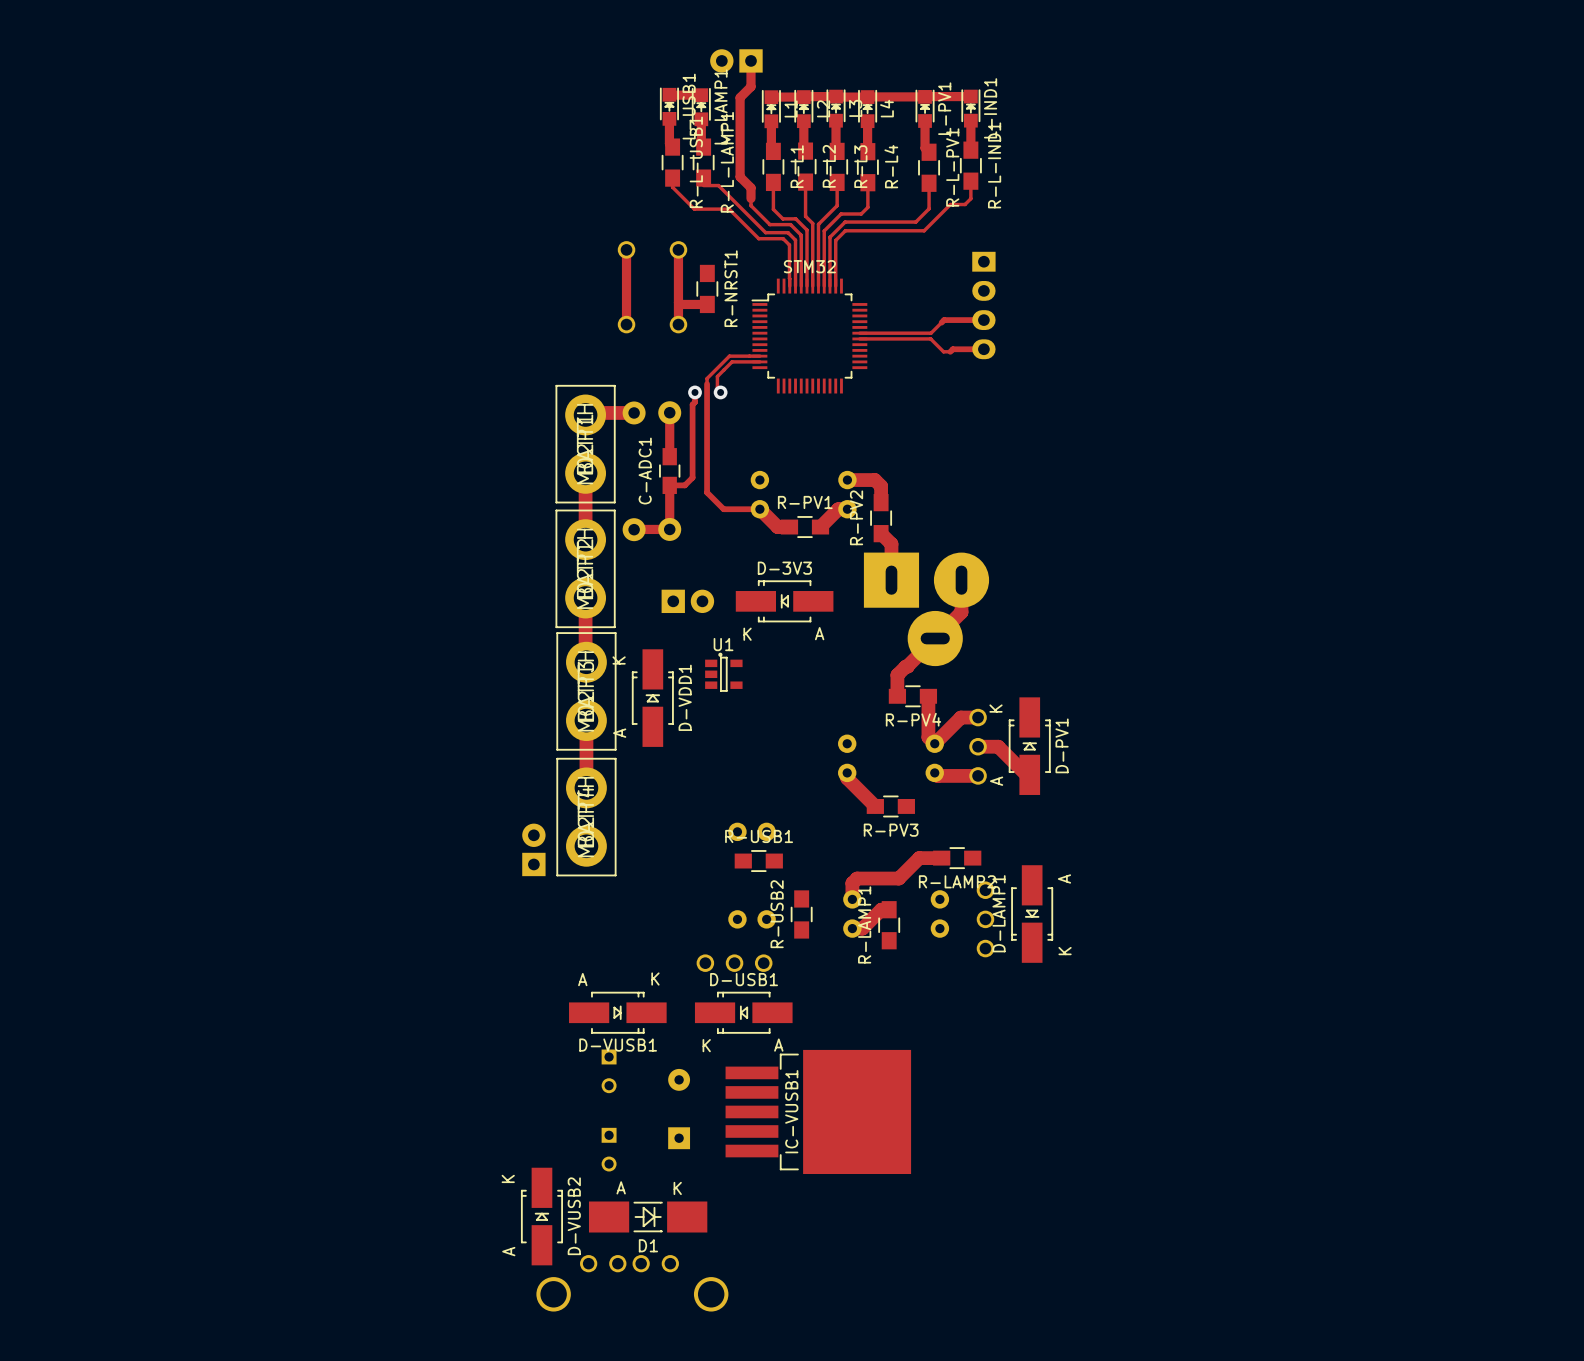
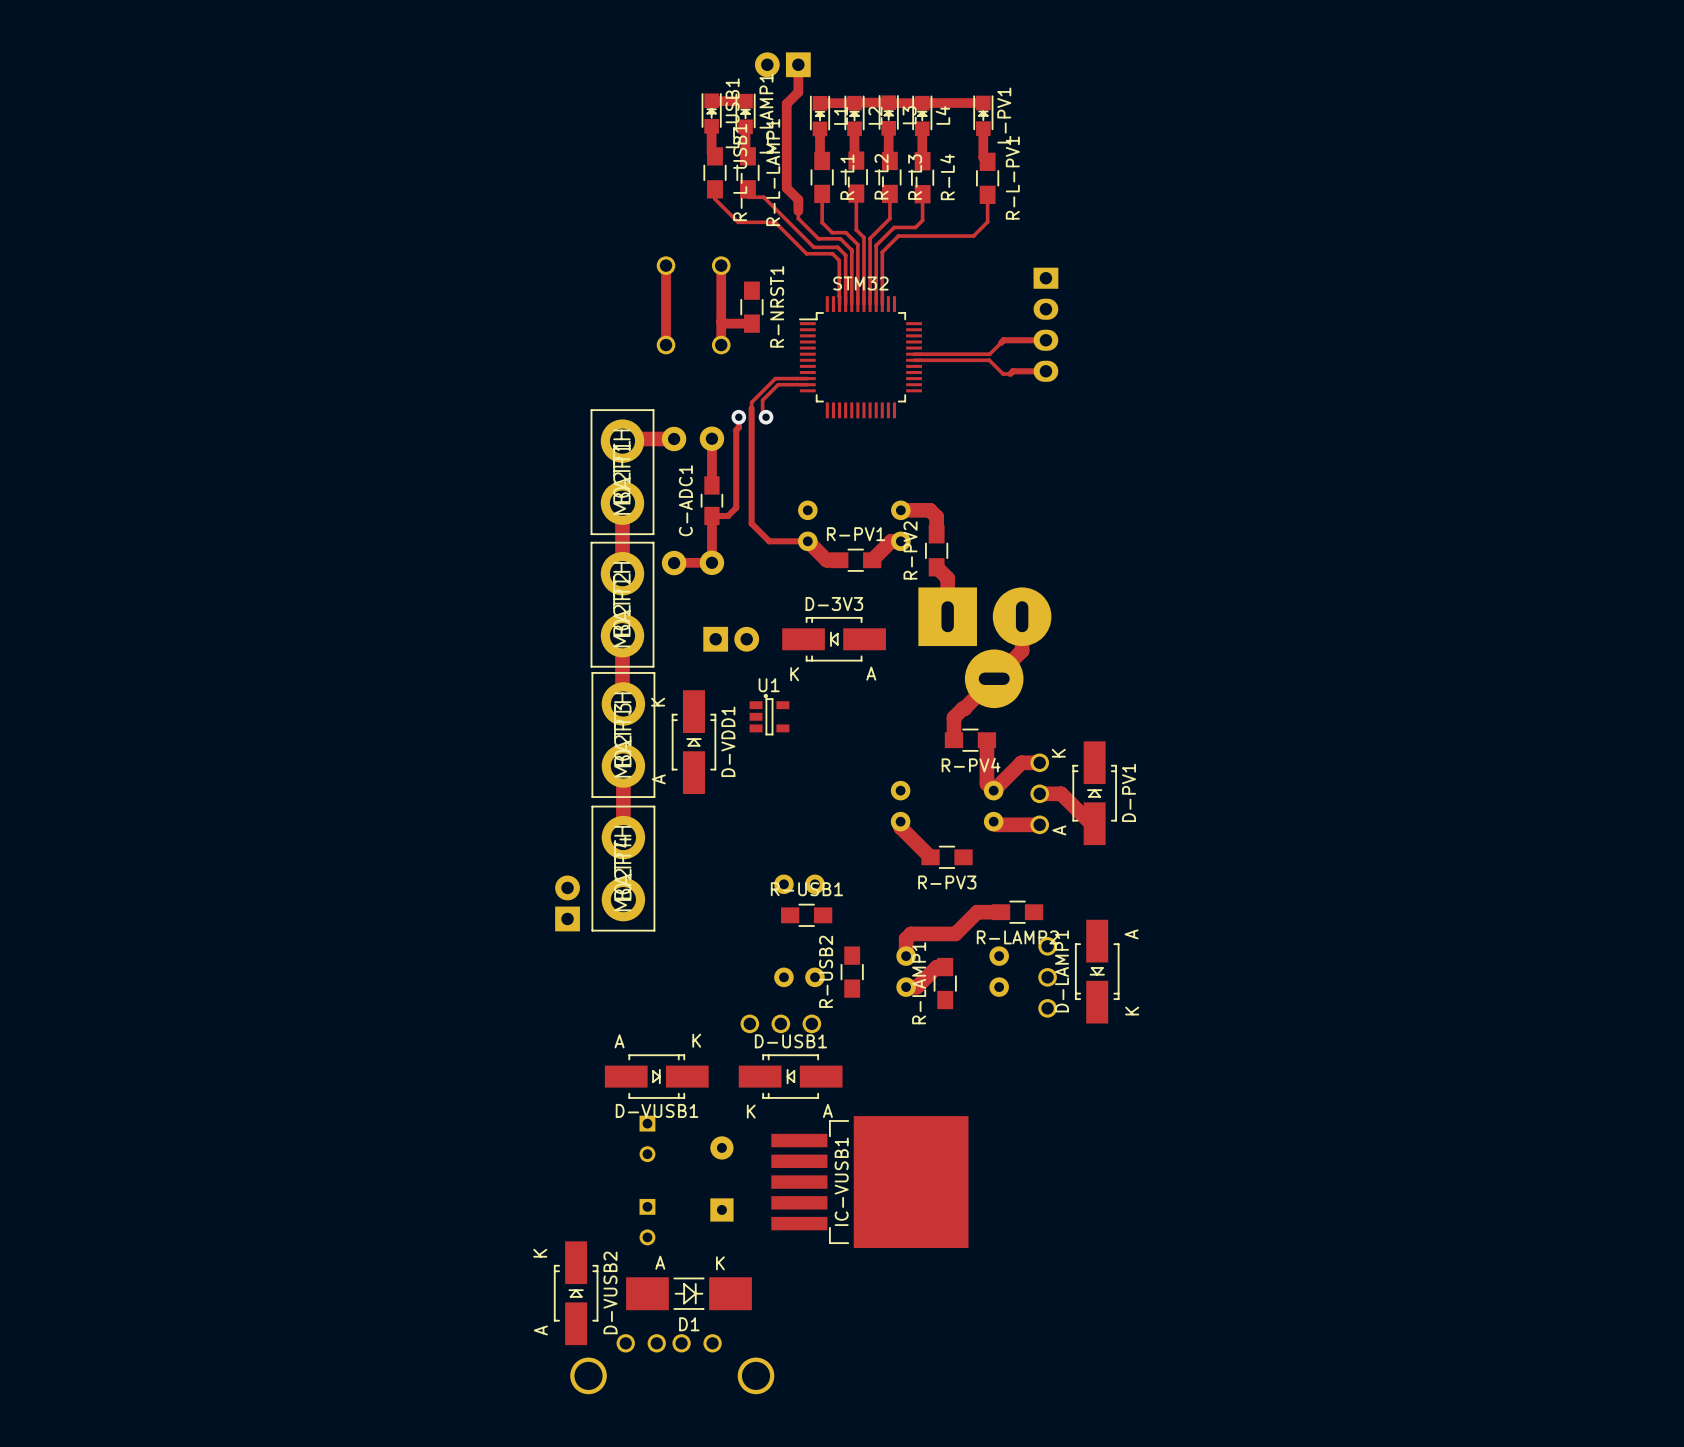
track: (970, 96) (925, 96) -> none
L-IND1: (970, 108) -> none
track: (970, 120) (970, 150) -> none
R-L-IND1: (970, 165) -> none
track: (970, 181) (970, 198) (965, 204) (950, 204) (924, 230) (845, 230) (835, 240) (835, 286) -> none

